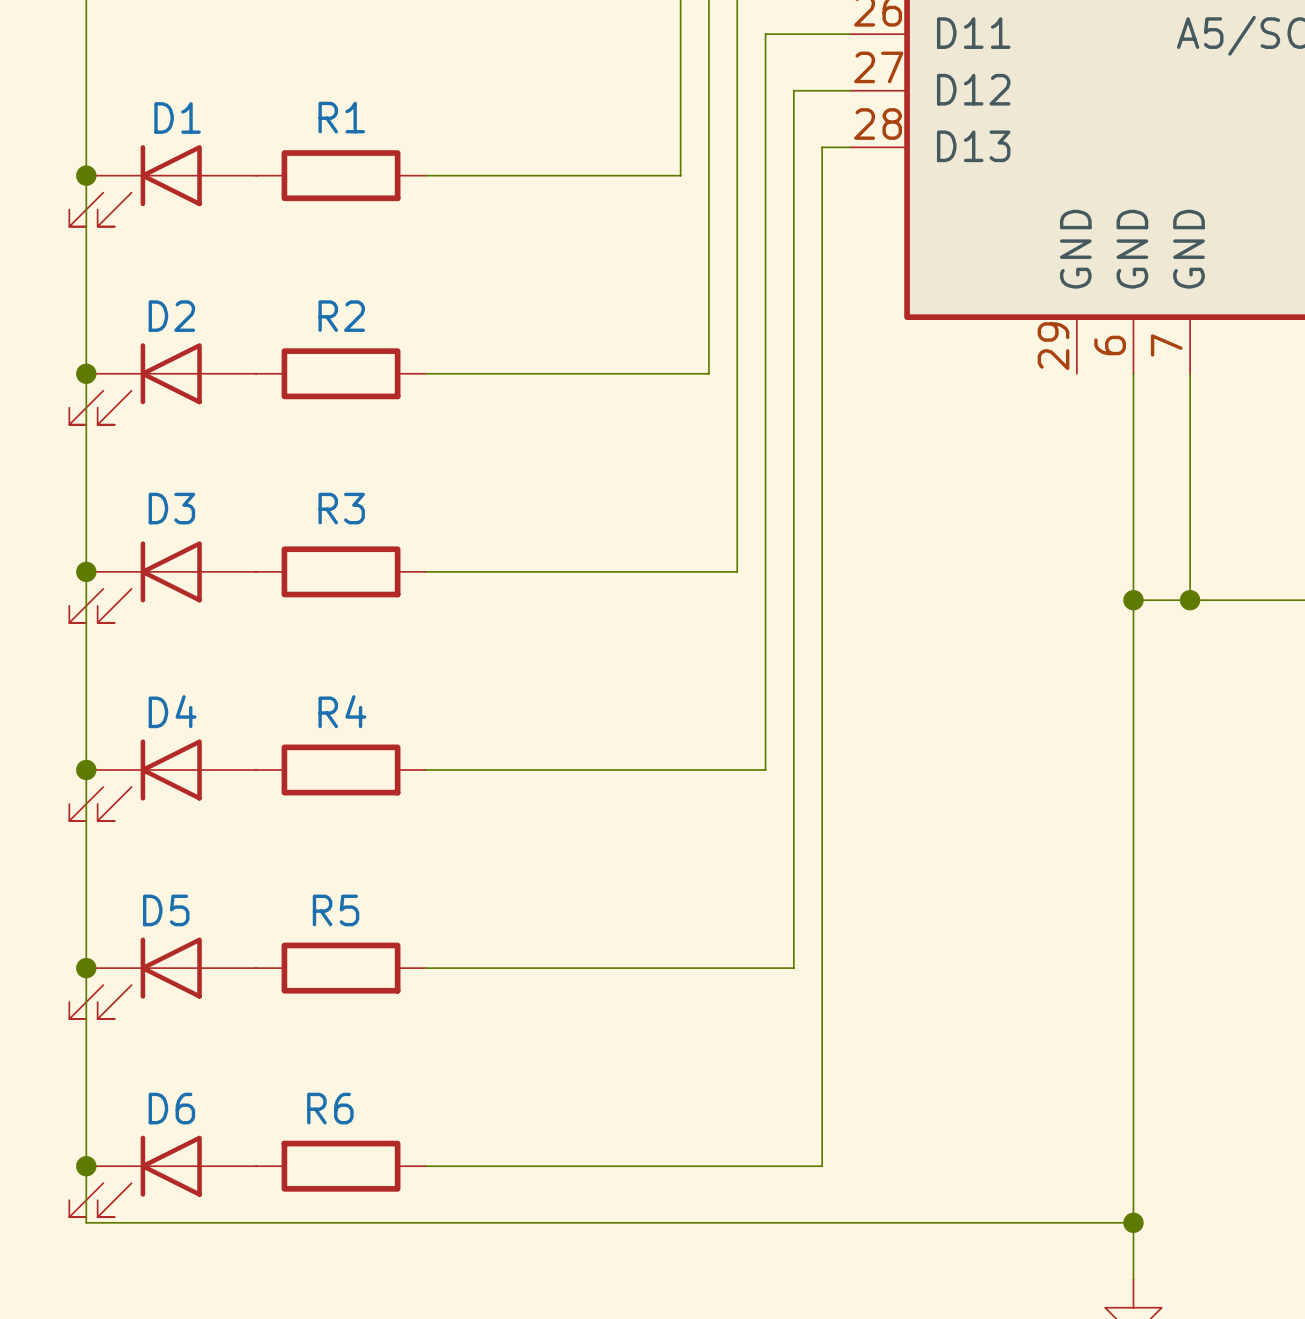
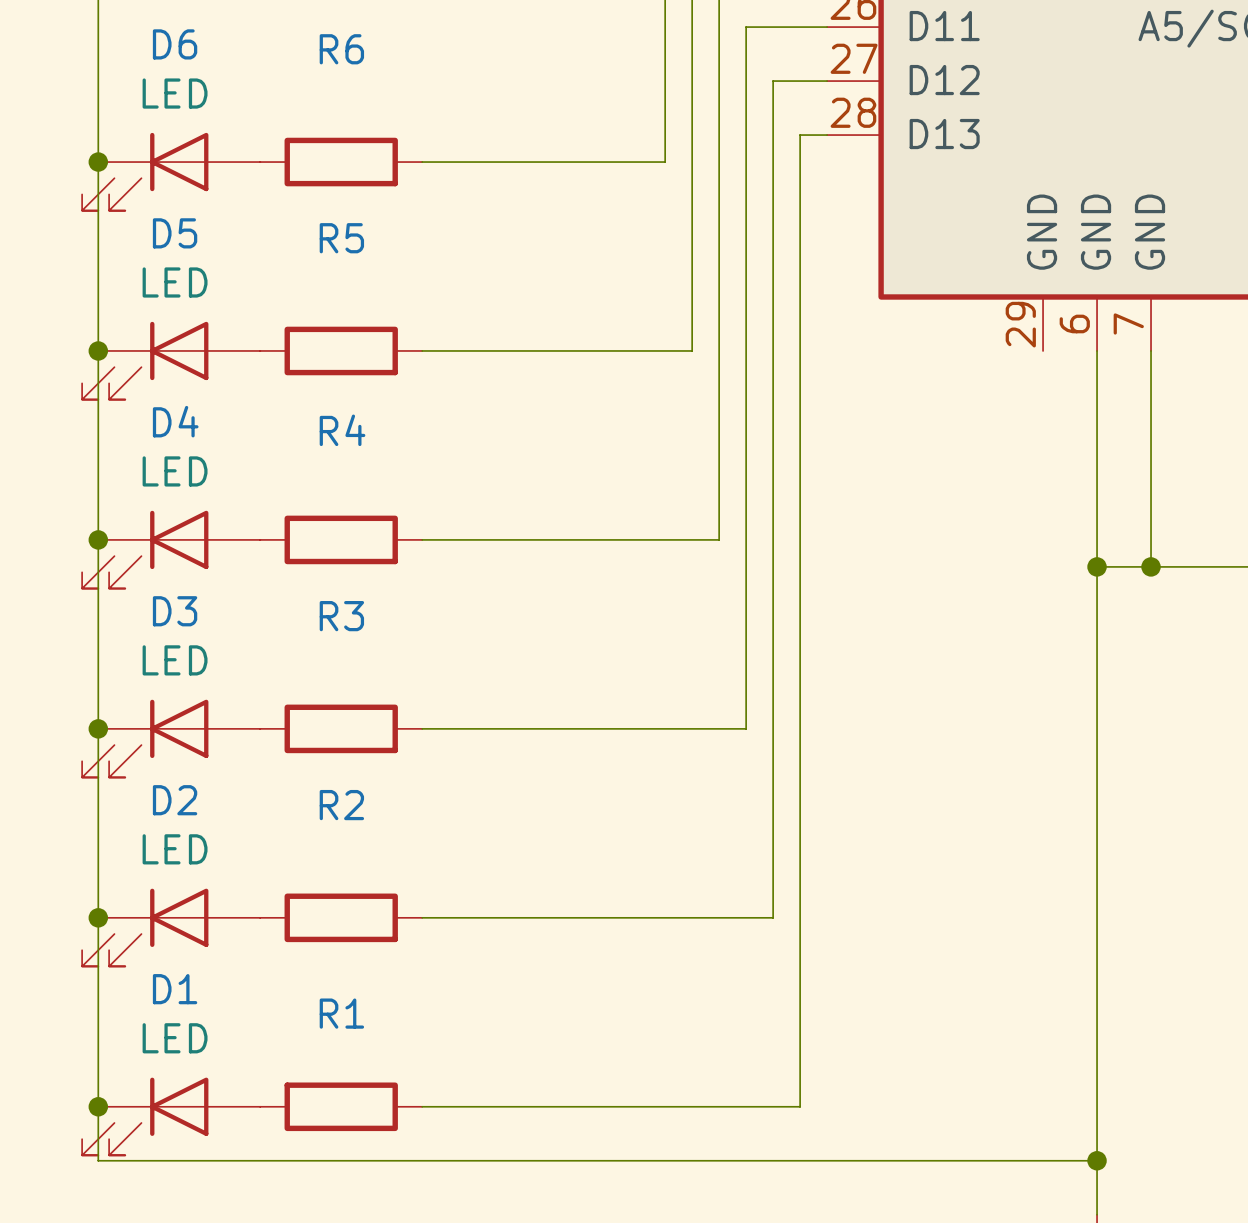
D6 value: none -> LED (175, 93)
R1 name position: R1 (341, 117) -> R1 (341, 1013)
D1 name position: D1 (177, 118) -> D1 (175, 989)
D5 value: none -> LED (175, 282)
D2 name position: D2 (171, 316) -> D2 (175, 800)
R2 name position: R2 (341, 316) -> R2 (341, 805)
D4 value: none -> LED (175, 471)
D3 name position: D3 (171, 508) -> D3 (175, 611)
R3 name position: R3 (341, 508) -> R3 (341, 616)
D3 value: none -> LED (175, 660)
D4 name position: D4 (172, 711) -> D4 (175, 421)
R4 name position: R4 (342, 711) -> R4 (342, 430)
D2 value: none -> LED (175, 849)
D5 name position: D5 (166, 910) -> D5 (175, 233)
R5 name position: R5 (336, 910) -> R5 (341, 238)
D1 value: none -> LED (175, 1038)
D6 name position: D6 (171, 1108) -> D6 (175, 44)
R6 name position: R6 (330, 1108) -> R6 (341, 49)

